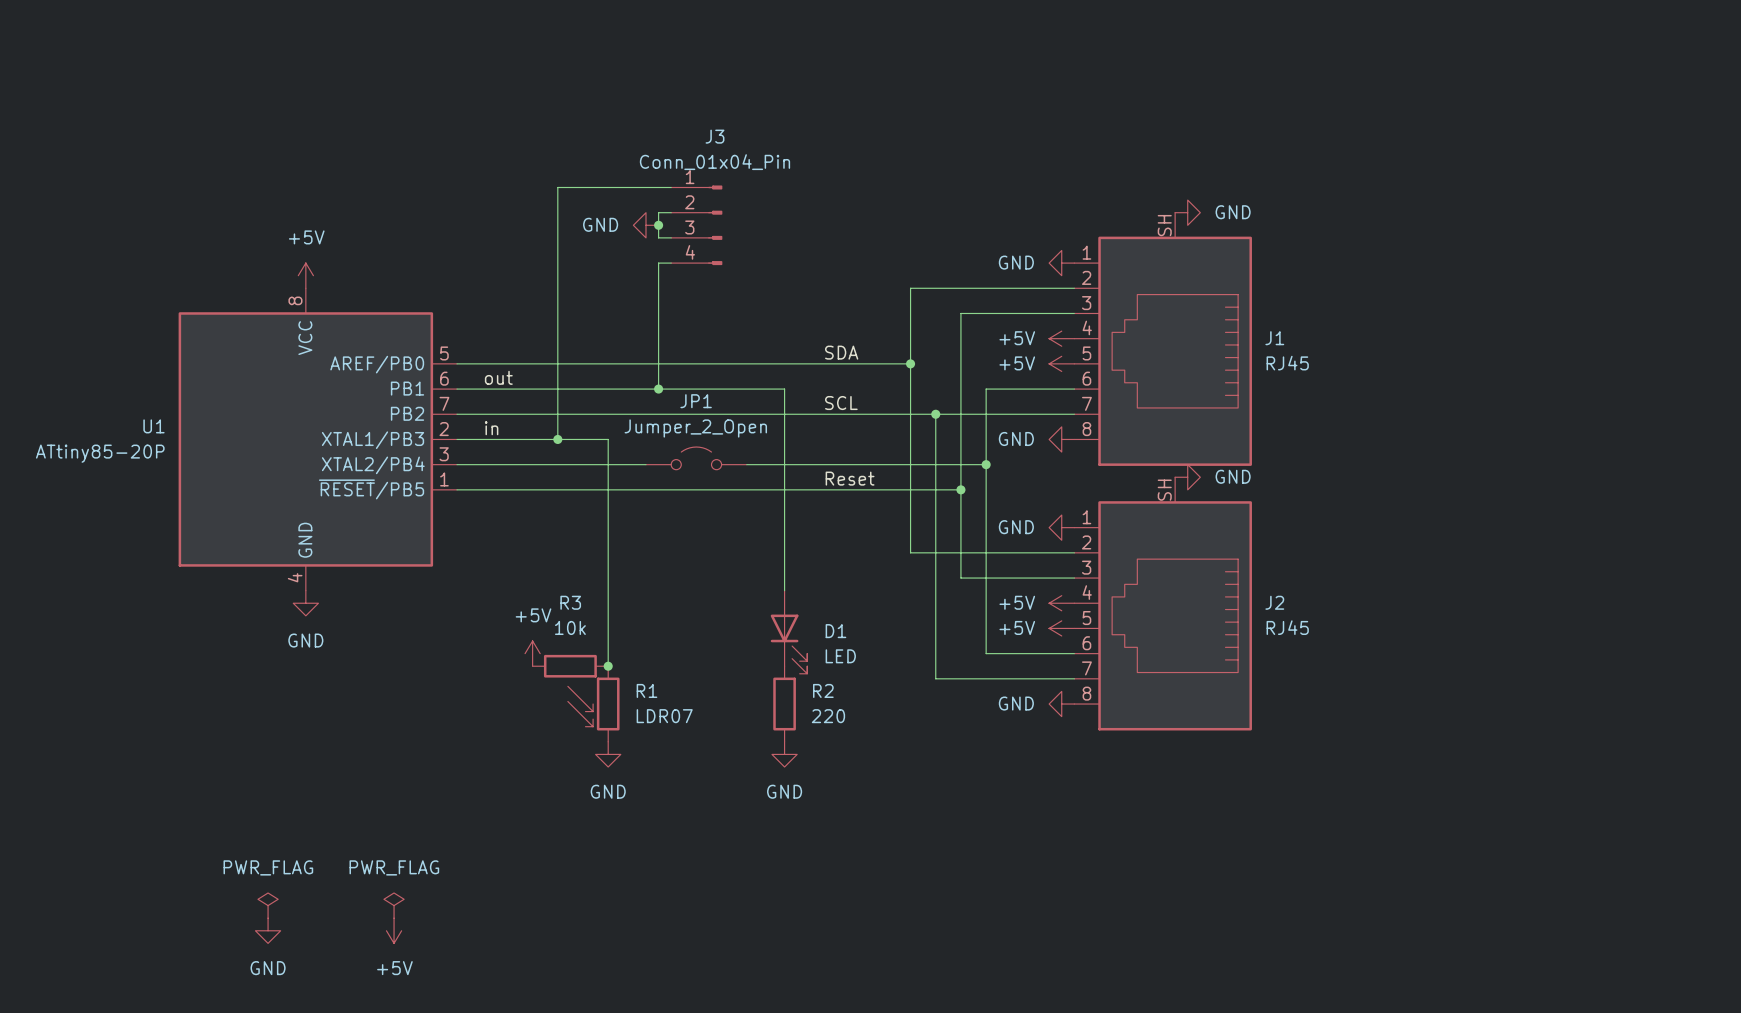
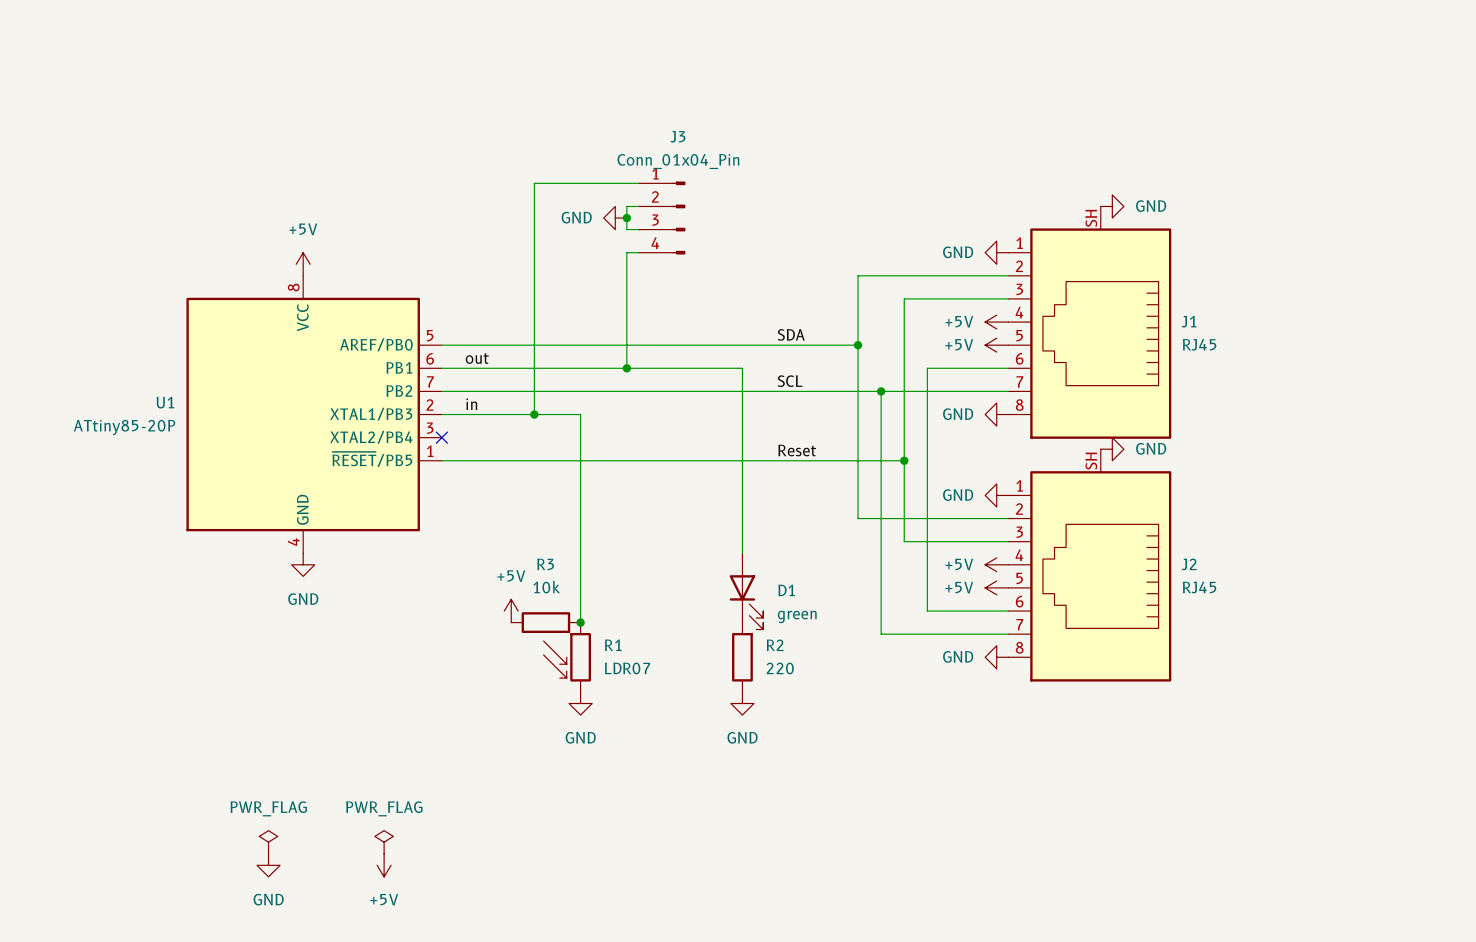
JP1: Jumper_2_Open (696, 458) -> none
wire: (457, 464) (646, 464) -> none
no-connect mark: none -> (441, 437)
wire: (746, 464) (986, 464) -> none
junction: (986, 464) -> none
D1 value: LED (840, 656) -> green (797, 616)

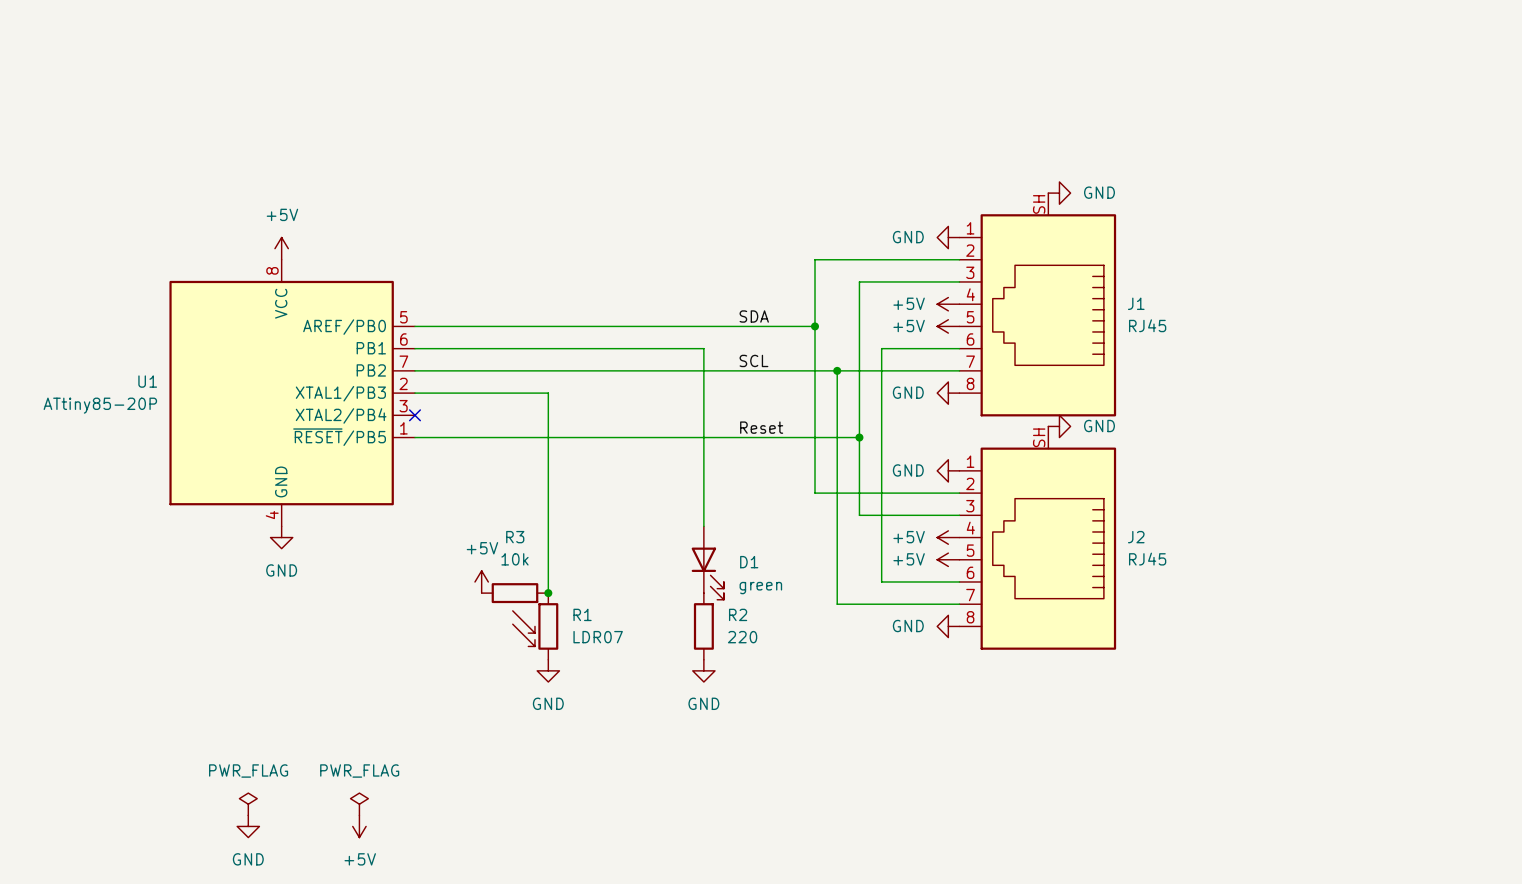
wire: (638, 183) (534, 183) (534, 414) -> none
wire: (638, 206) (626, 206) (626, 229) (638, 229) -> none
power symbol: GND (615, 218) -> none
junction: (626, 218) -> none
J3: Conn_01x04_Pin (661, 218) -> none
wire: (638, 252) (626, 252) (626, 368) -> none
label: out (477, 358) -> none
junction: (626, 368) -> none
label: in (471, 404) -> none
junction: (534, 414) -> none

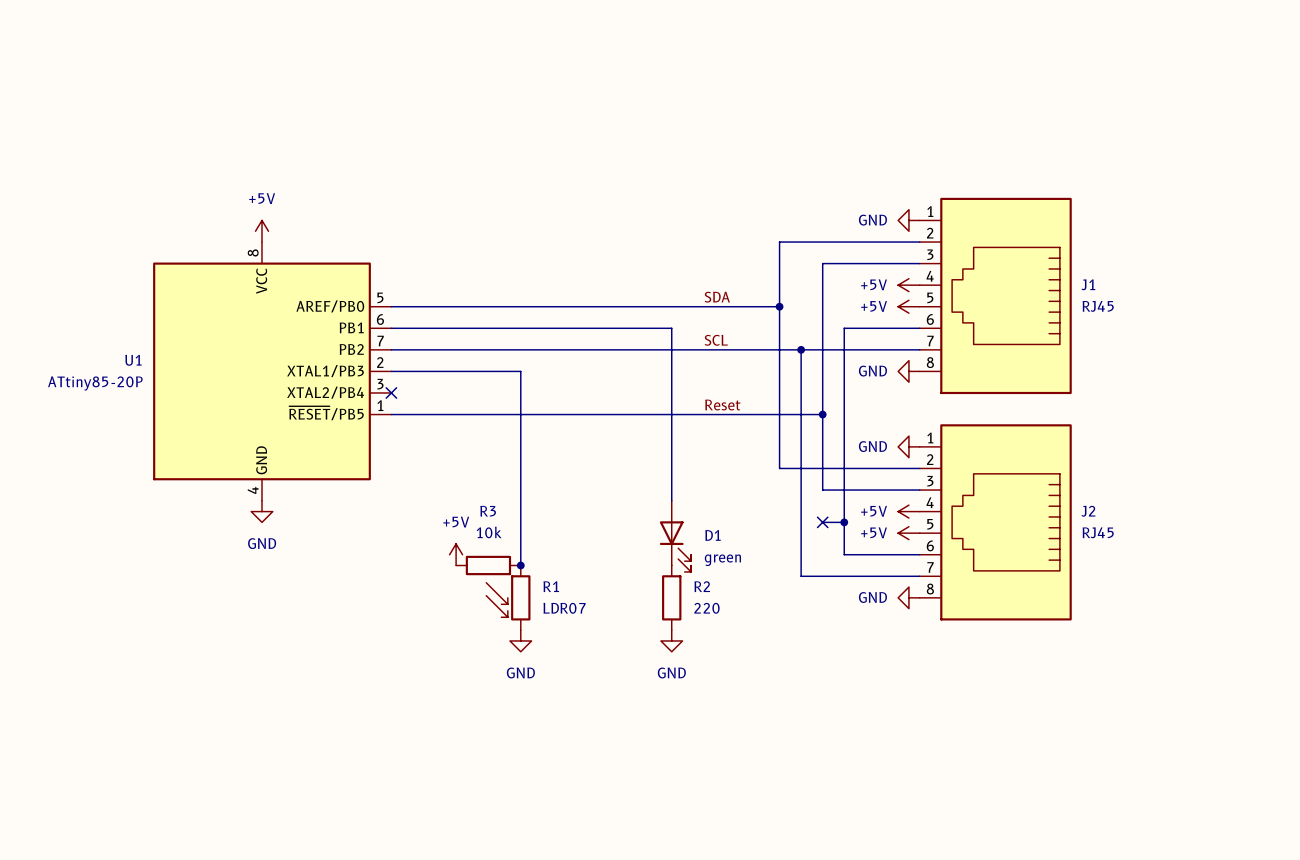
J1 symbol: [959, 193, 1117, 417] -> [919, 197, 1072, 395]
power symbol: GND (1059, 193) -> none
J2 symbol: [959, 426, 1117, 650] -> [919, 424, 1072, 621]
power symbol: GND (1059, 426) -> none
wire: none -> (822, 522) (844, 522)
no-connect mark: none -> (822, 522)
junction: none -> (844, 522)
power symbol: PWR_FLAG (248, 804) -> none
power symbol: PWR_FLAG (359, 804) -> none
power symbol: GND (248, 826) -> none
power symbol: +5V (359, 826) -> none

